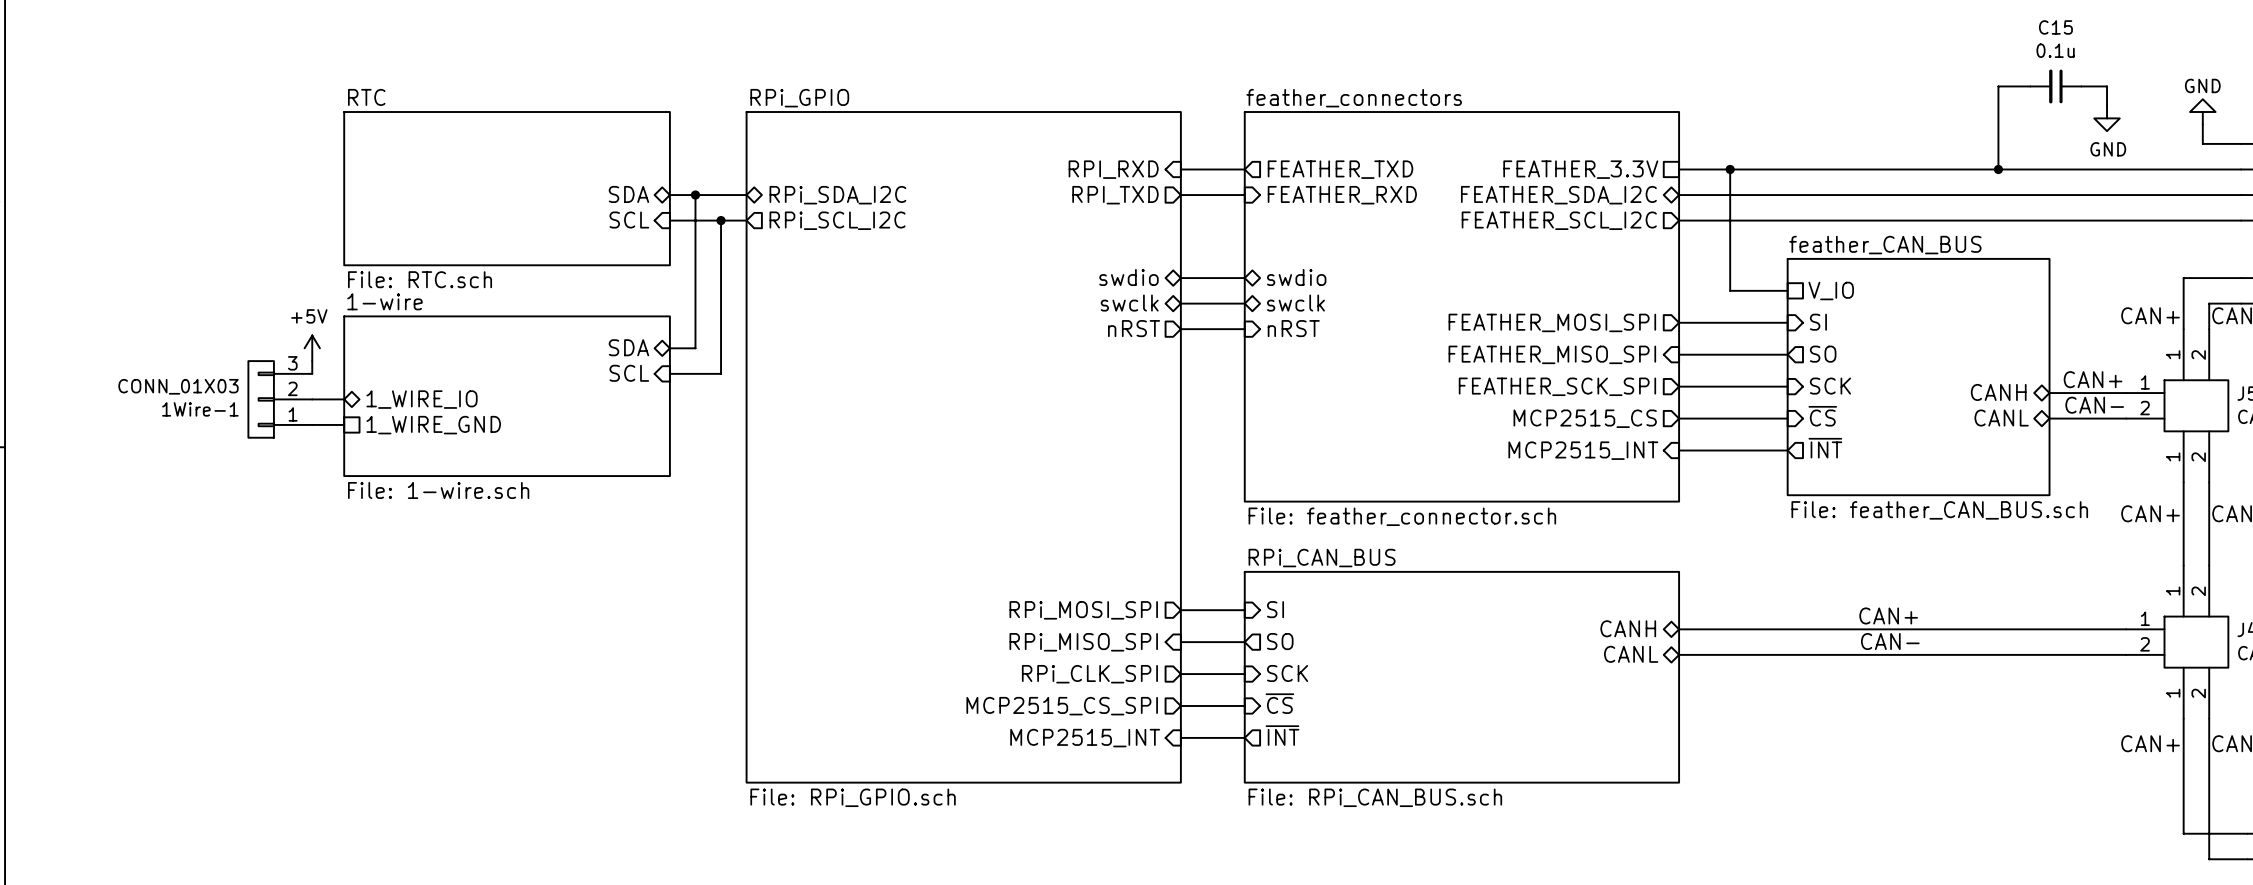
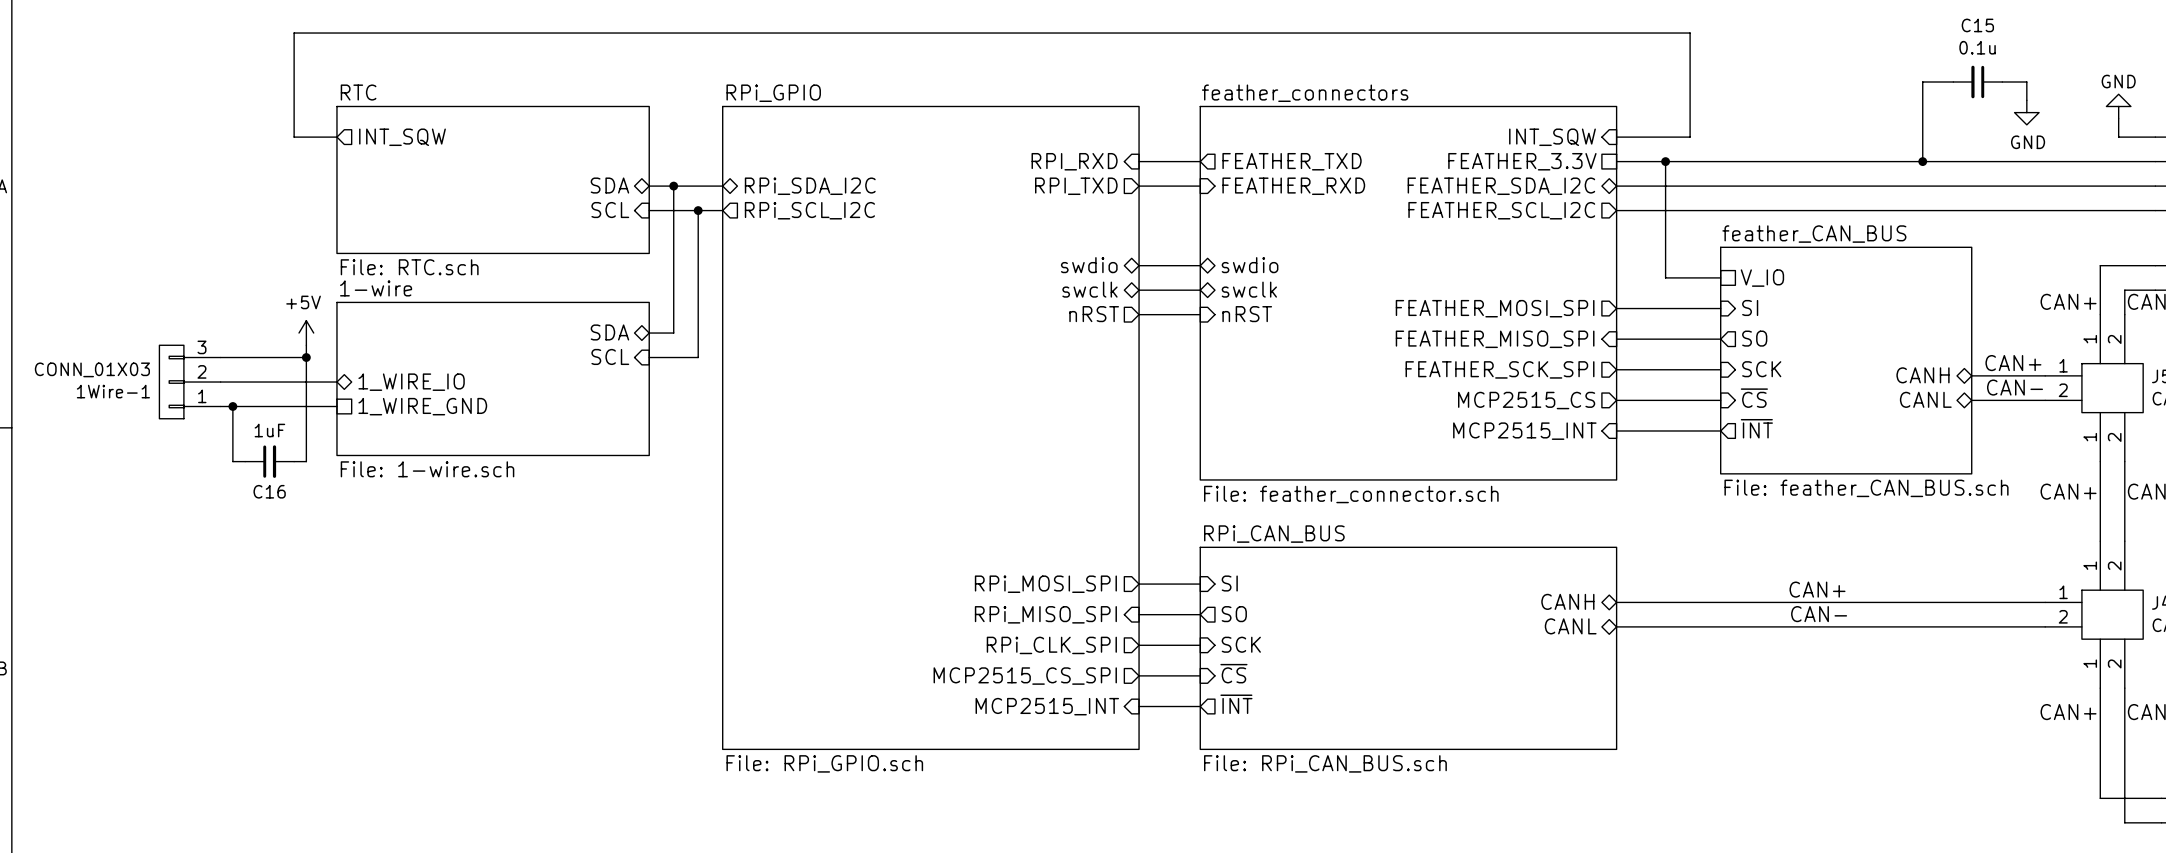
wire: none -> (336, 137) (294, 137) (294, 33) (1690, 33) (1690, 137) (1616, 137)
sheet pin: none -> INT_SQW (402, 137)
sheet pin: none -> INT_SQW (1552, 137)
wire: none -> (220, 357) (306, 357) (306, 461) (294, 461)
junction: none -> (306, 357)
wire: none -> (220, 382) (306, 382)
1Wire-1 position: (280, 399) -> (190, 382)
wire: none -> (220, 406) (306, 406)
wire: none -> (232, 406) (232, 461) (245, 461)
junction: none -> (232, 406)
C16: none -> 1uF (269, 461)

